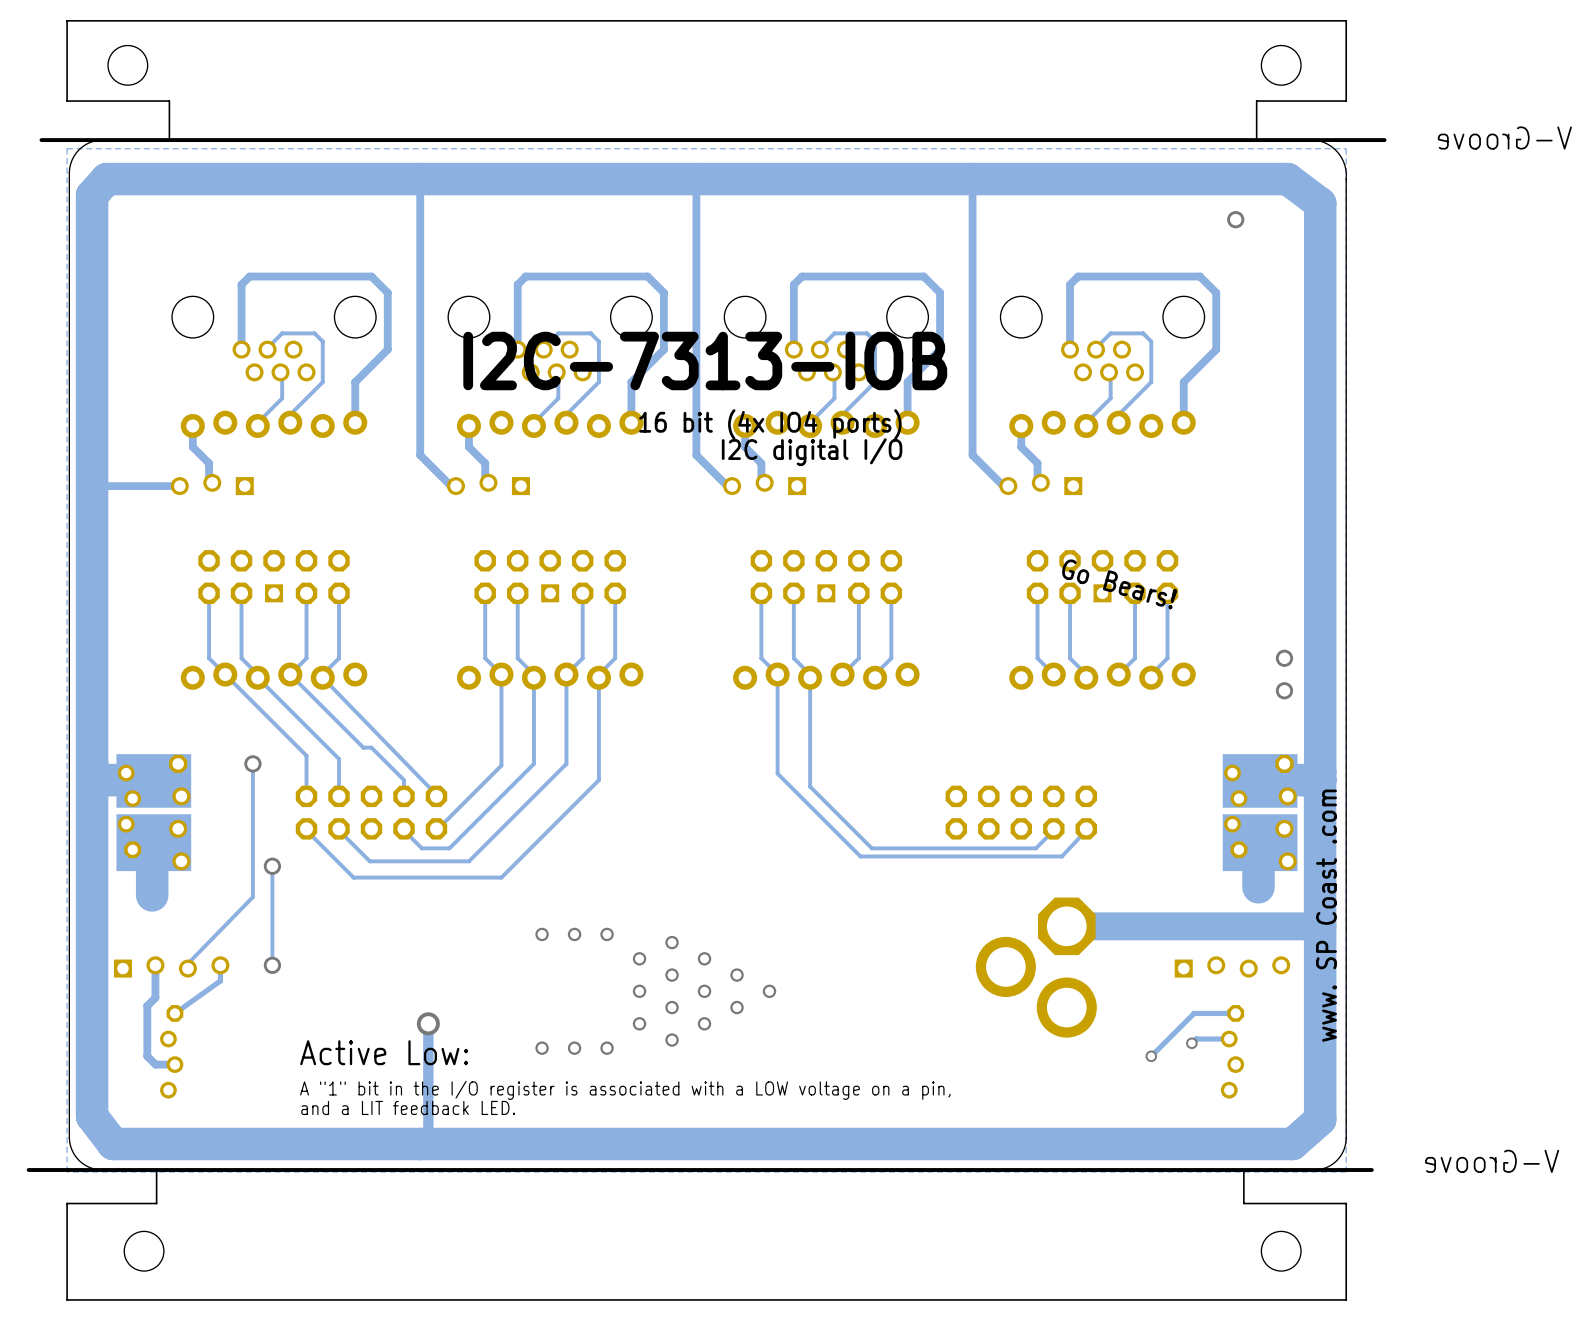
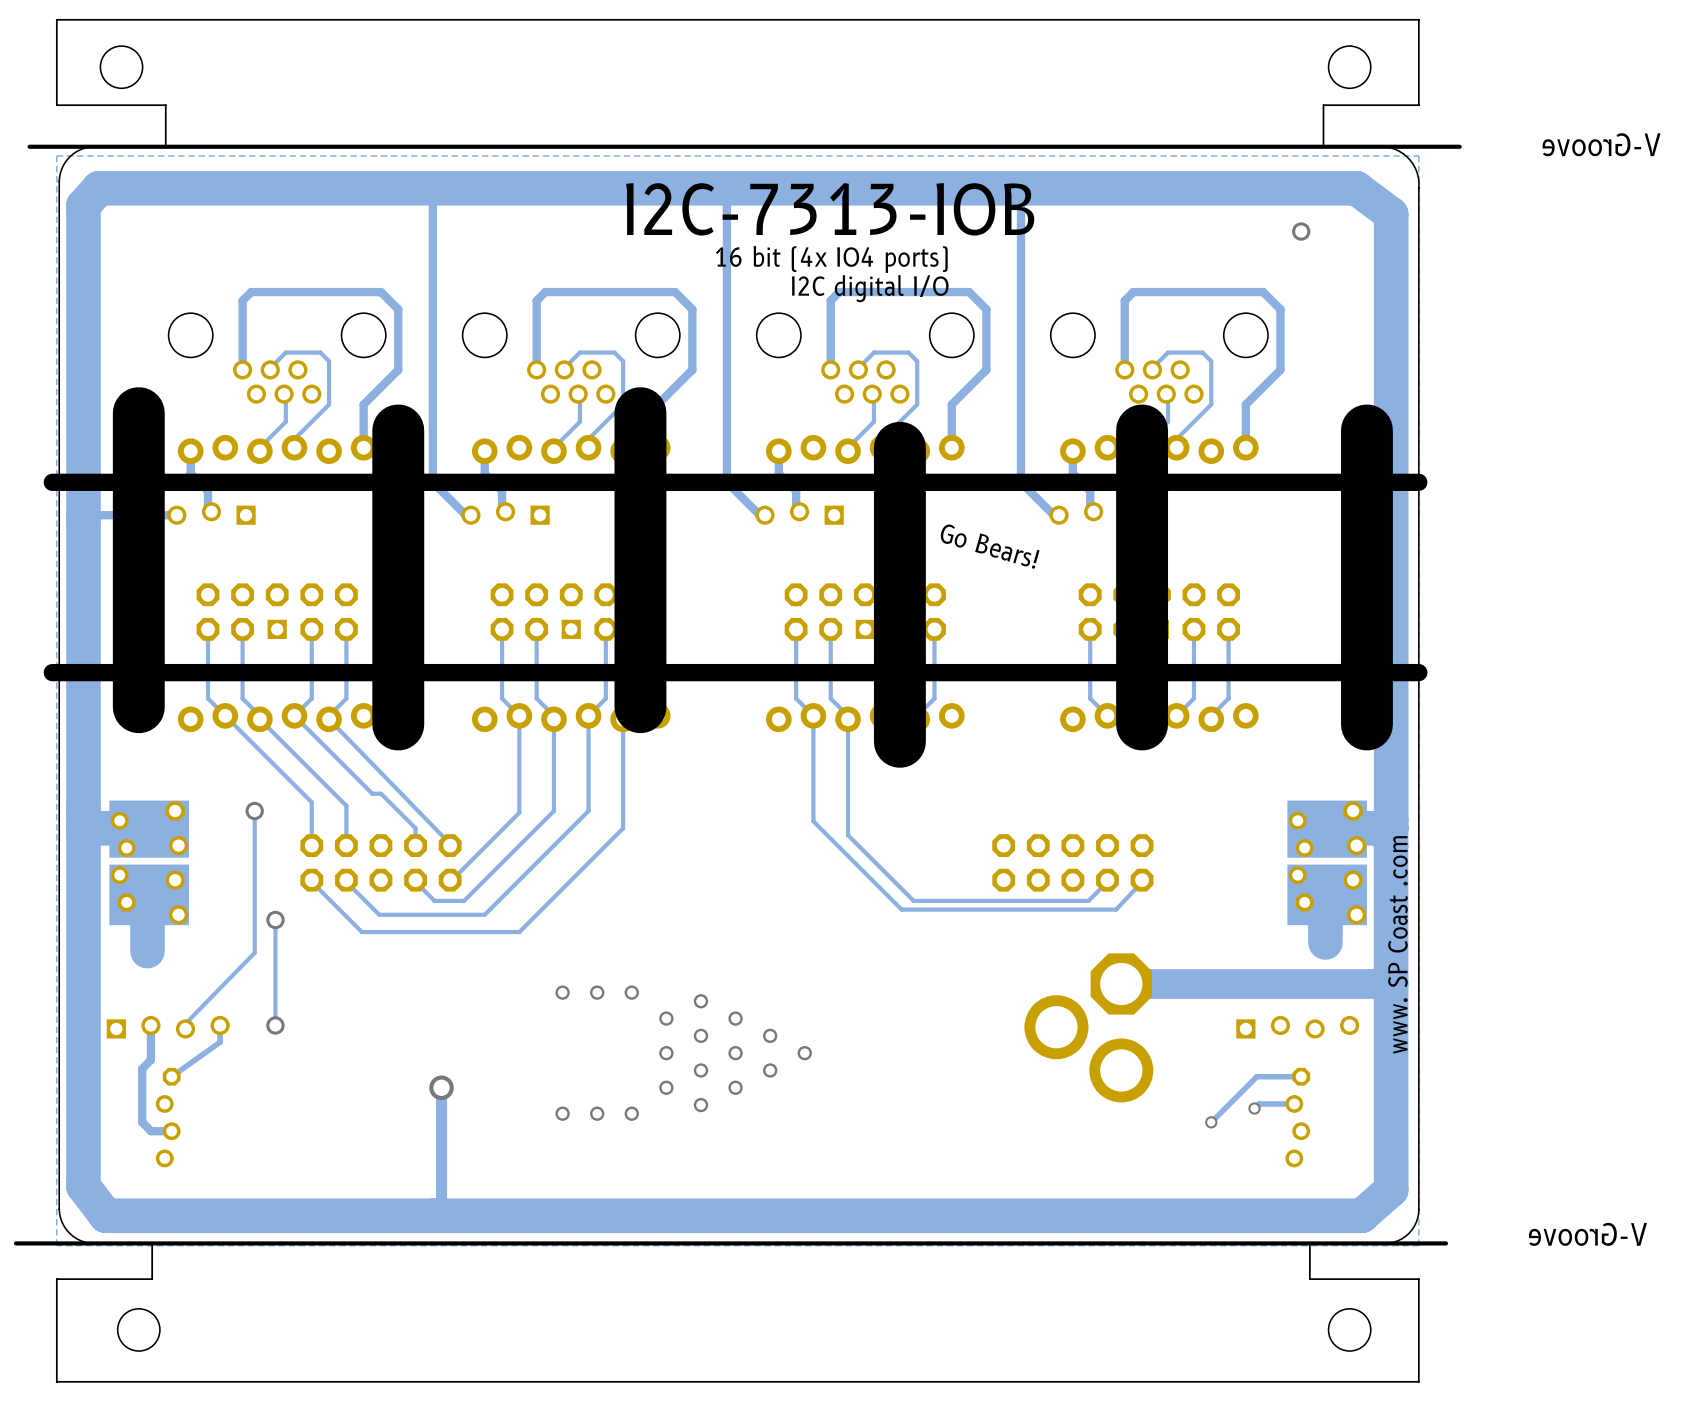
text position: I2C-7313-IOB (705, 361) -> I2C-7313-IOB (830, 209)
line: none -> (138, 413) (138, 707)
line: none -> (640, 413) (640, 707)
line: none -> (398, 430) (398, 724)
line: none -> (1142, 430) (1142, 724)
line: none -> (1366, 430) (1366, 724)
line: none -> (899, 447) (899, 741)
text position: 16 bit (4x IO4 ports) (770, 424) -> 16 bit (4x IO4 ports) (831, 259)
text position: I2C digital I/O (812, 452) -> I2C digital I/O (870, 288)
line: none -> (1418, 482) (52, 482)
text position: Go Bears! (1119, 584) -> Go Bears! (990, 546)
line: none -> (1418, 672) (52, 672)
text: Active Low: (384, 1052) -> none
text: A "1" bit in the I/O register is associated with a LOW voltage on a pin, (625, 1090) -> none
text: and a LIT feedback LED. (408, 1107) -> none

